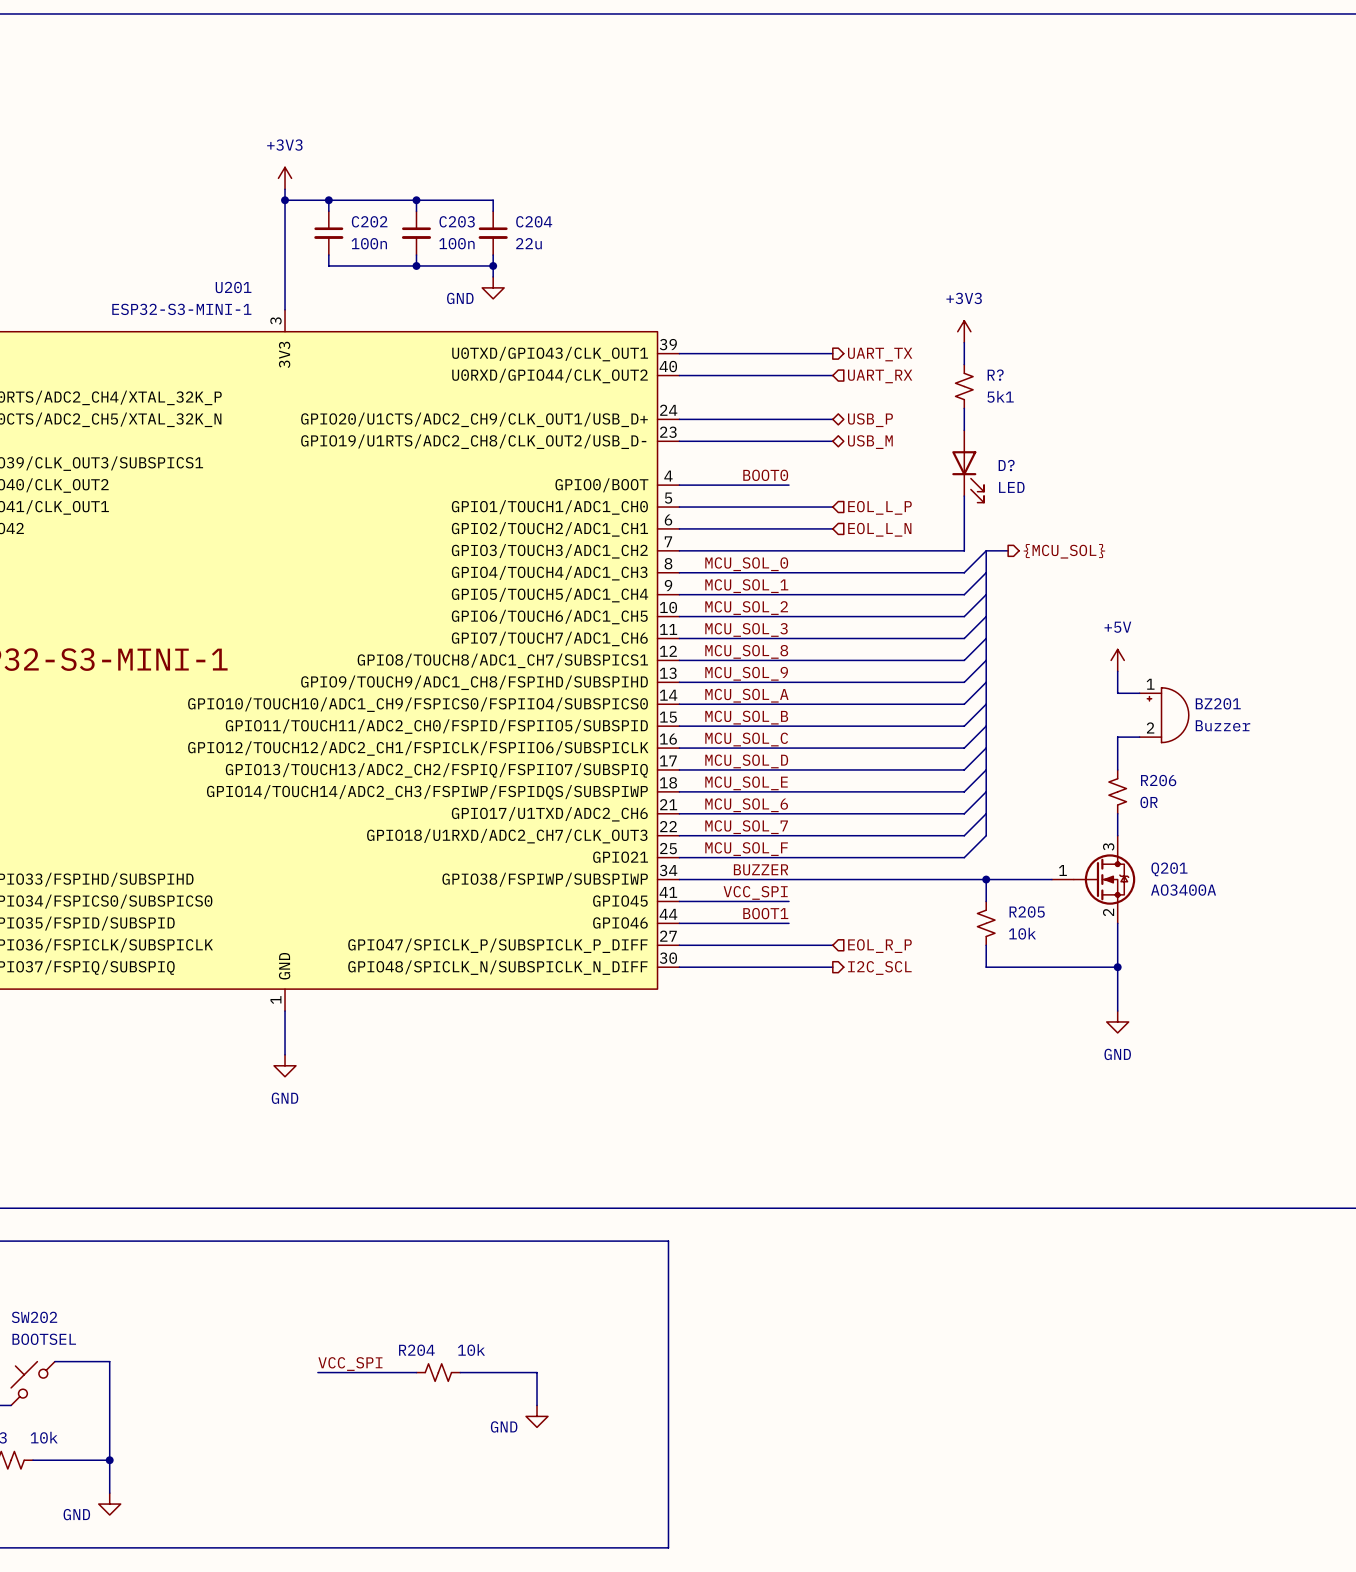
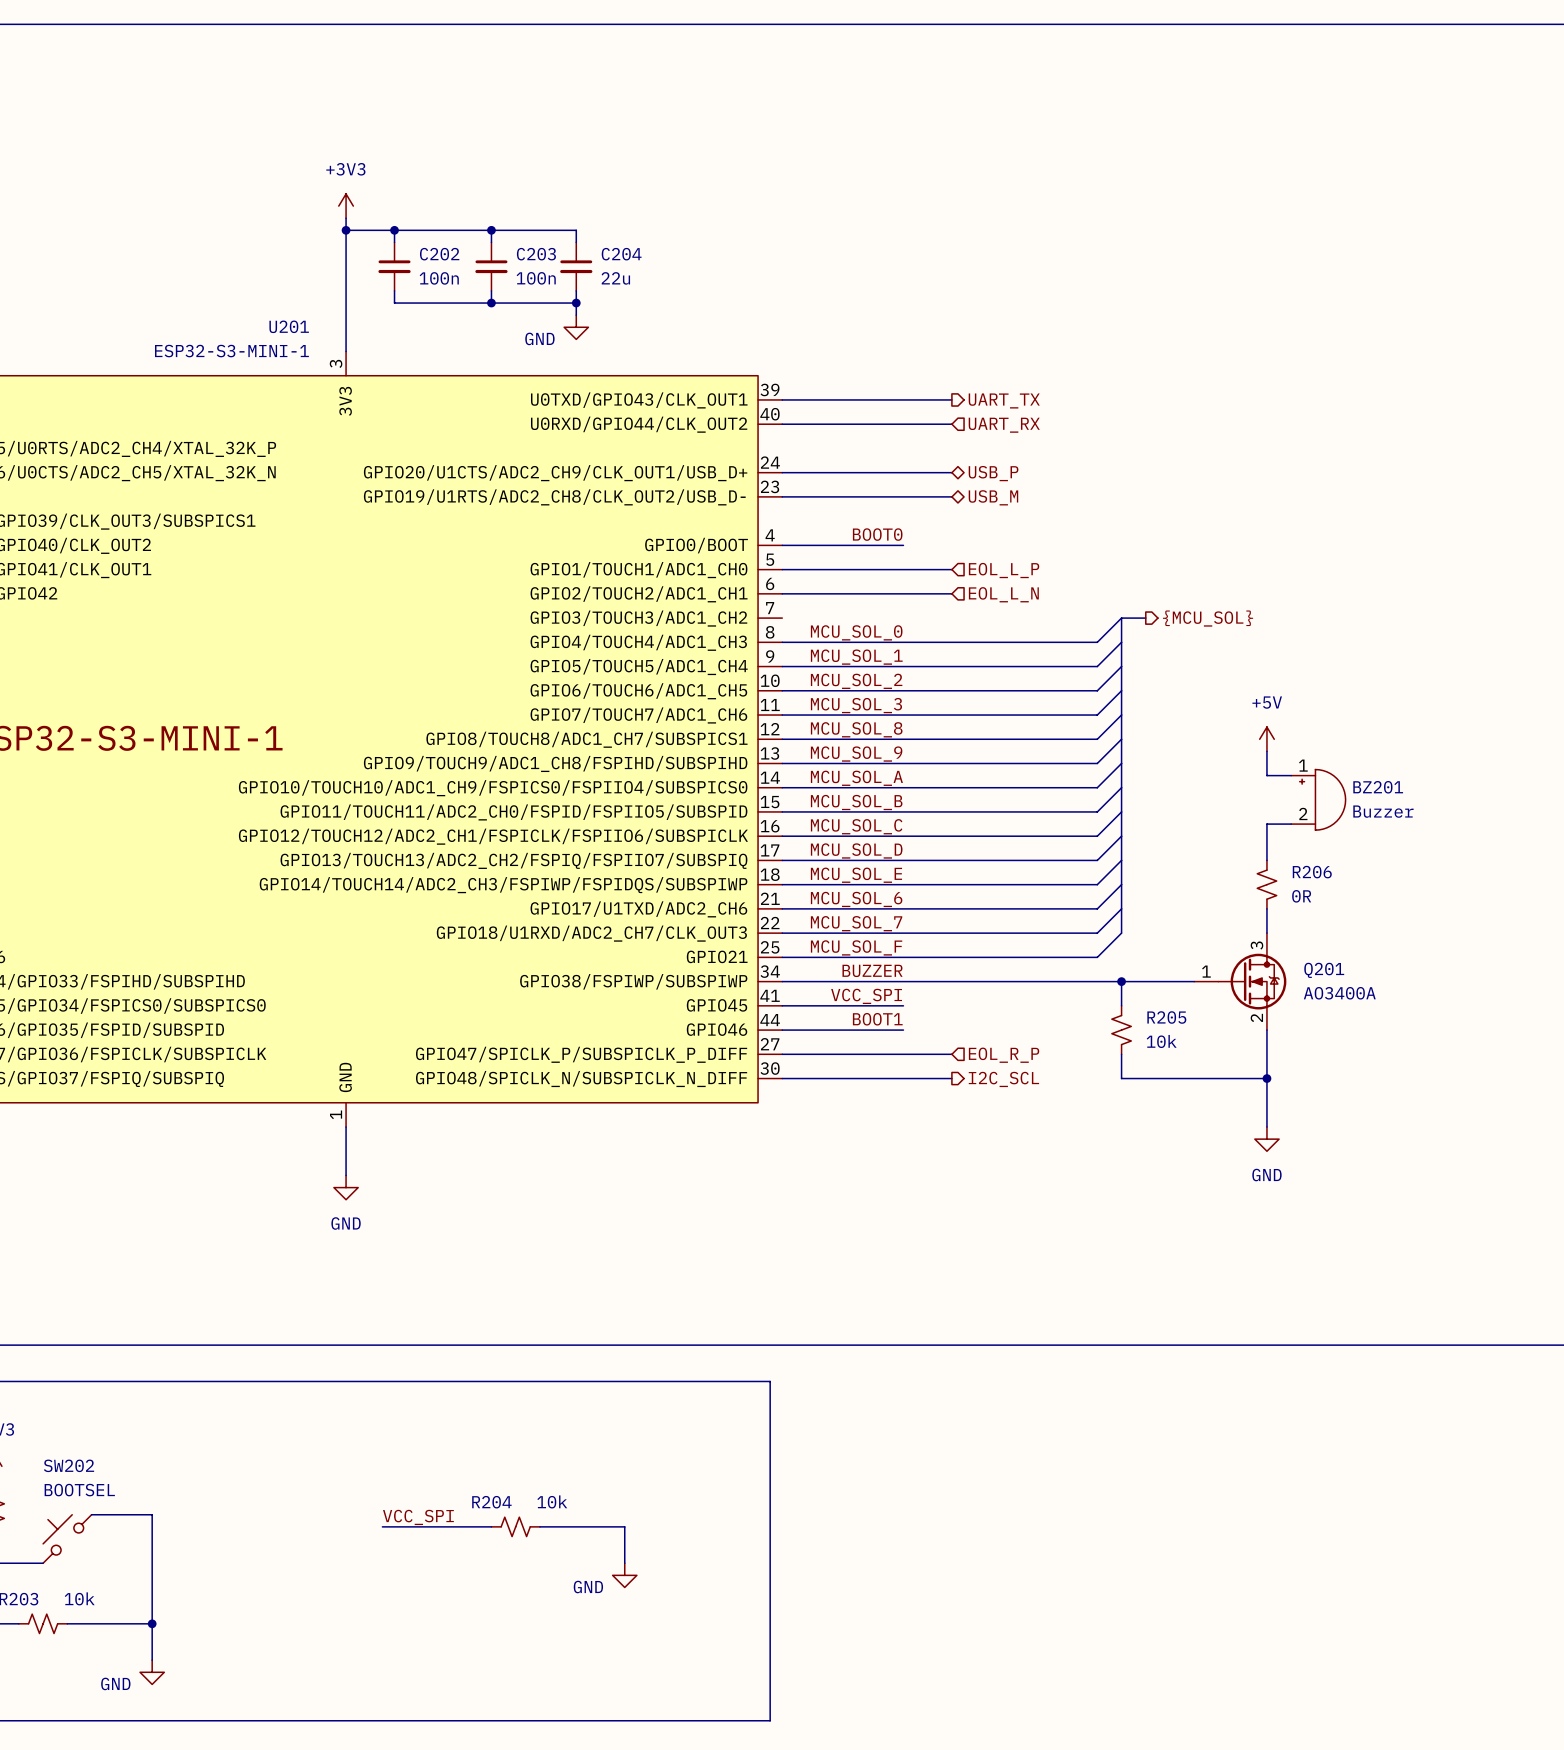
power symbol: +3V3 (964, 331) -> none
wire: (964, 342) (964, 364) -> none
R?: 5k1 (964, 386) -> none
wire: (964, 408) (964, 430) -> none
D?: LED (968, 466) -> none
wire: (964, 496) (964, 550) (679, 550) -> none

